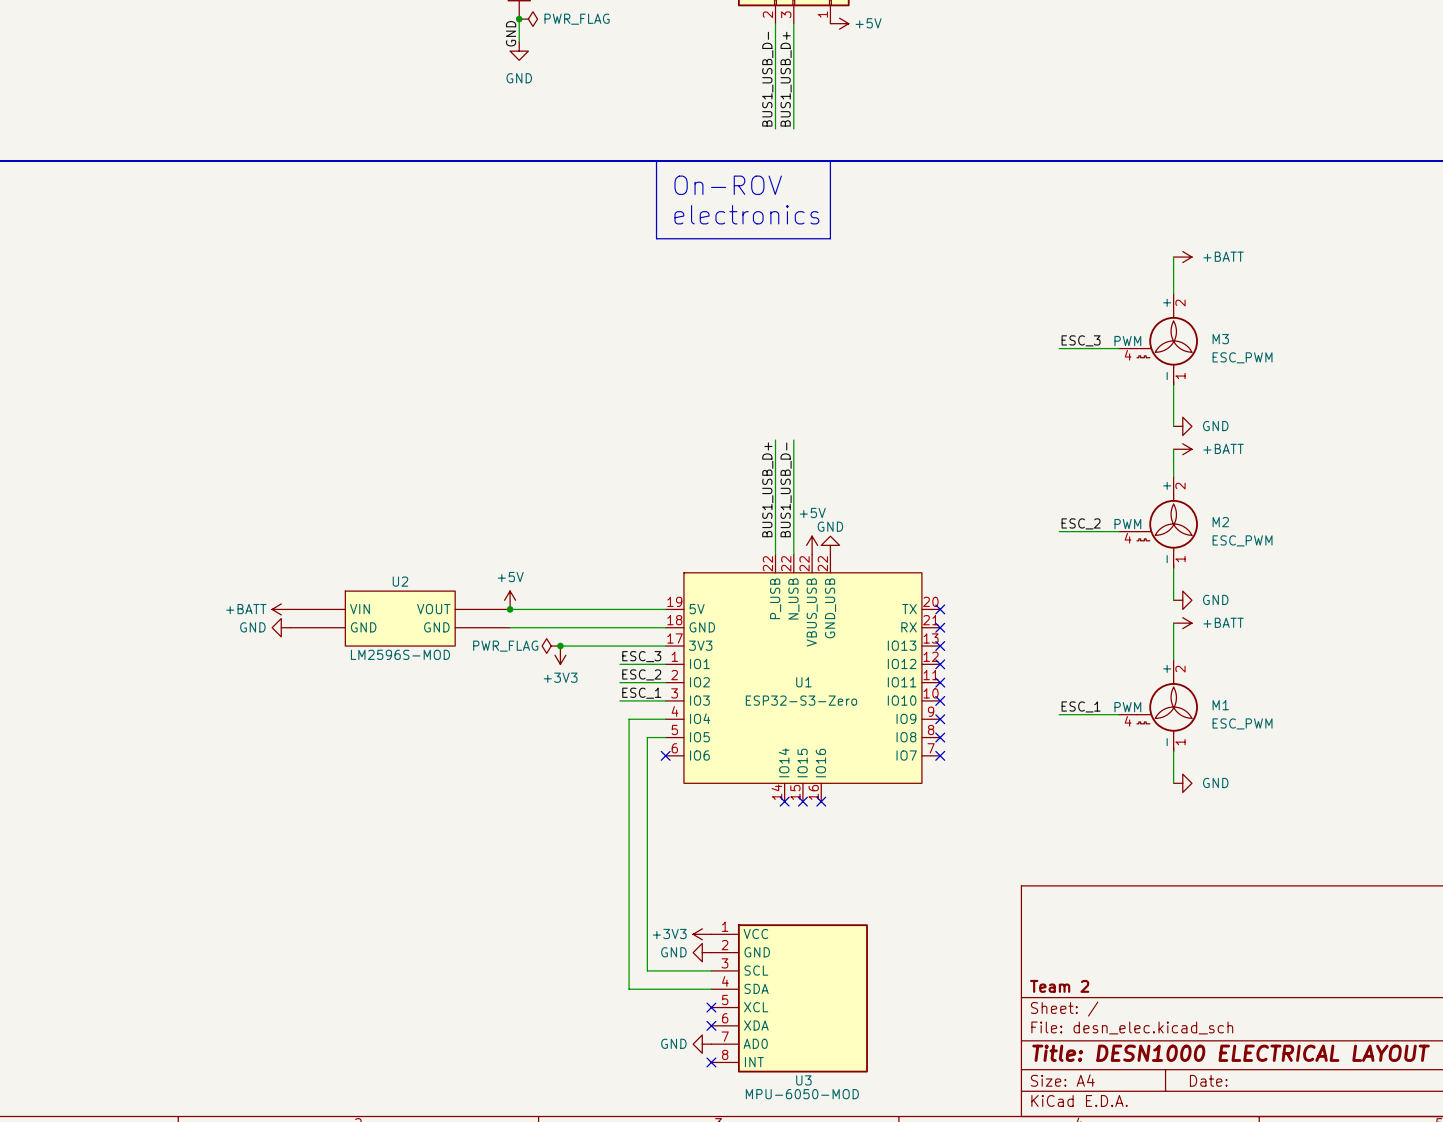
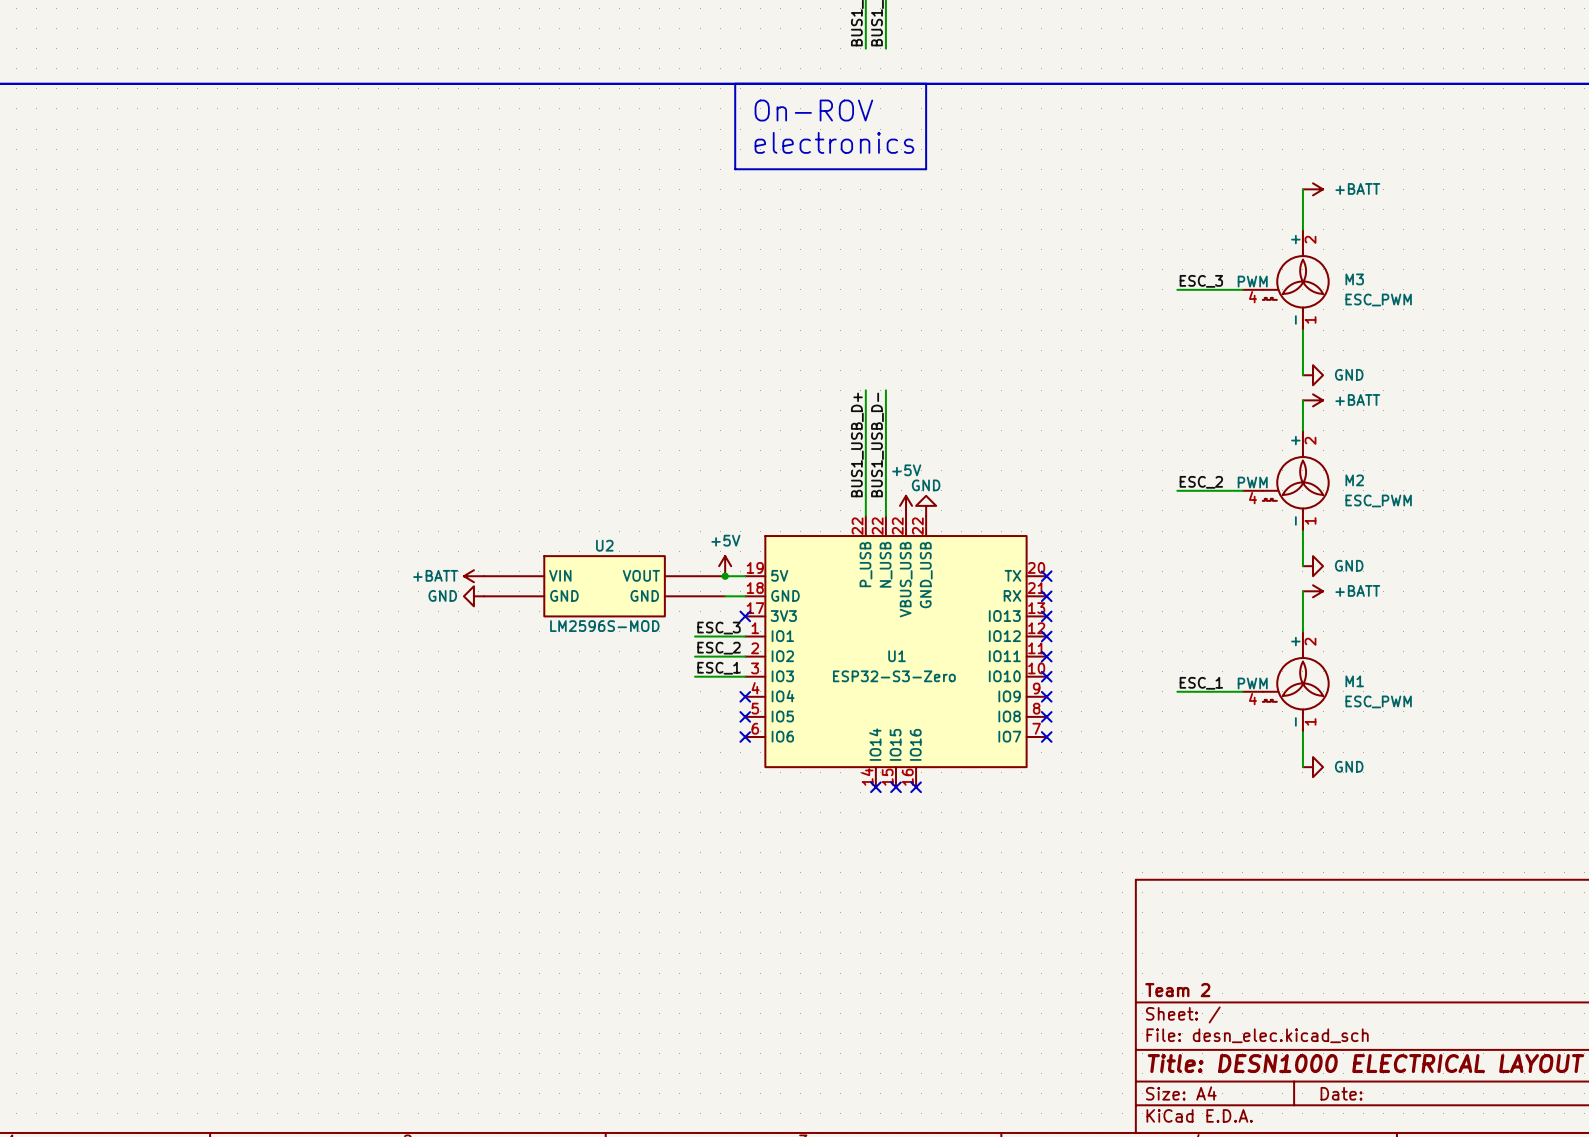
power symbol position: +5V (510, 600) -> +5V (725, 566)
power symbol position: +BATT (281, 609) -> +BATT (473, 576)
junction: (510, 609) -> none
junction: none -> (725, 576)
U2 position: (400, 618) -> (604, 586)
power symbol position: GND (281, 627) -> GND (473, 596)
power symbol: PWR_FLAG (551, 646) -> none
wire: (560, 646) (665, 646) -> none
junction: (560, 646) -> none
no-connect mark: none -> (745, 616)
power symbol: +3V3 (560, 655) -> none
wire: (665, 719) (629, 719) (629, 989) (711, 989) -> none
no-connect mark: none -> (745, 696)
wire: (665, 737) (647, 737) (647, 970) (711, 970) -> none
no-connect mark: none -> (745, 716)
power symbol: +3V3 (702, 934) -> none
power symbol: GND (702, 952) -> none
U3: MPU-6050-MOD (789, 998) -> none
no-connect mark: (711, 1007) -> none
no-connect mark: (711, 1025) -> none
power symbol: GND (702, 1044) -> none
no-connect mark: (711, 1062) -> none

